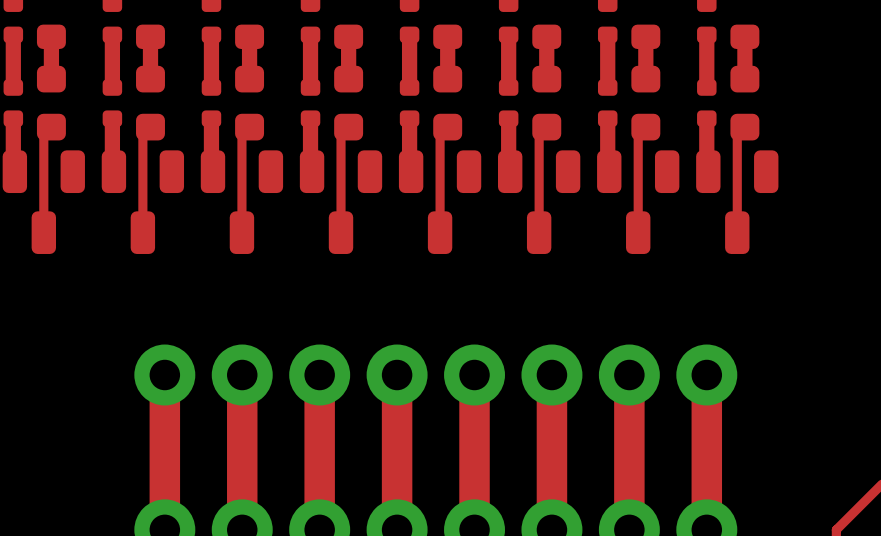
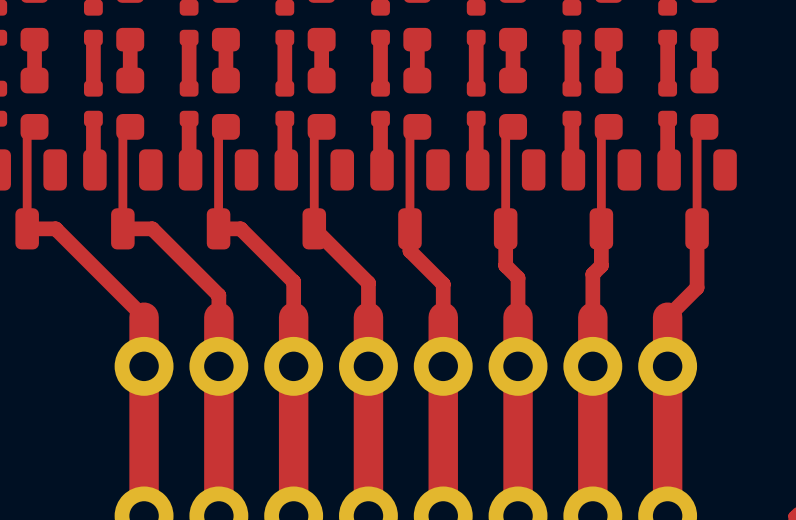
top track: none -> (27, 228) (55, 228) (144, 317) (144, 366)
top track: none -> (122, 228) (152, 228) (218, 295) (218, 366)
top track: none -> (218, 228) (240, 228) (293, 281) (293, 366)
top track: none -> (314, 228) (368, 283) (368, 366)
top track: none -> (409, 228) (409, 250) (443, 284) (443, 366)
top track: none -> (505, 228) (505, 265) (518, 278) (518, 366)
top track: none -> (601, 228) (601, 265) (592, 274) (592, 366)
top track: none -> (697, 228) (697, 287) (667, 317) (667, 366)

